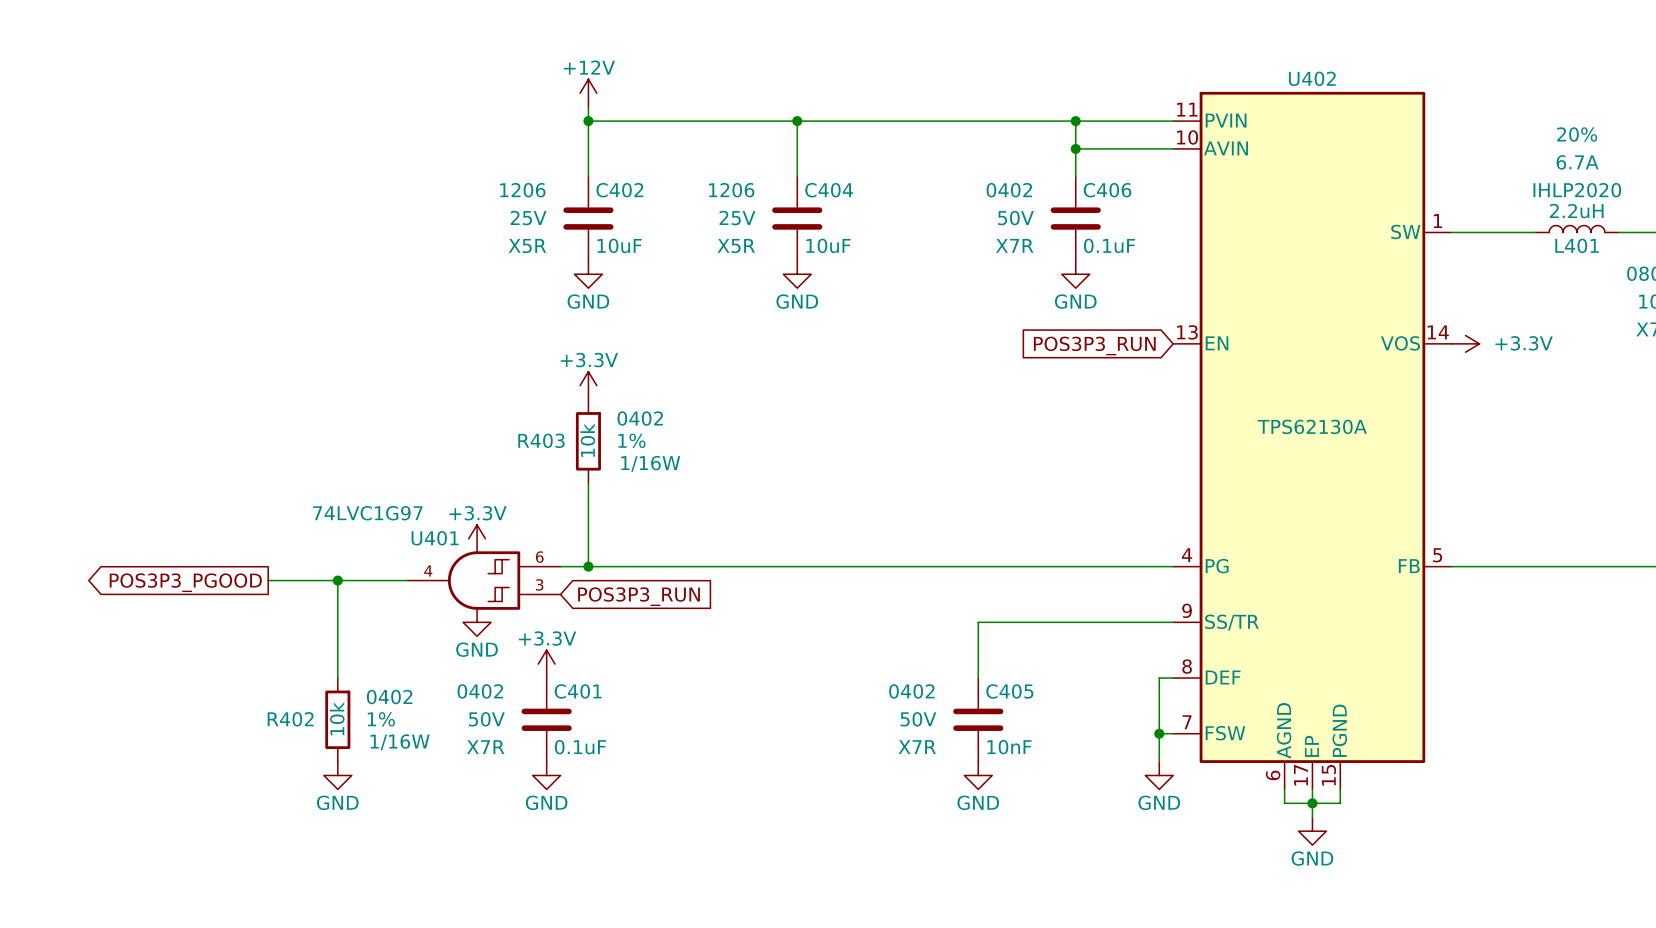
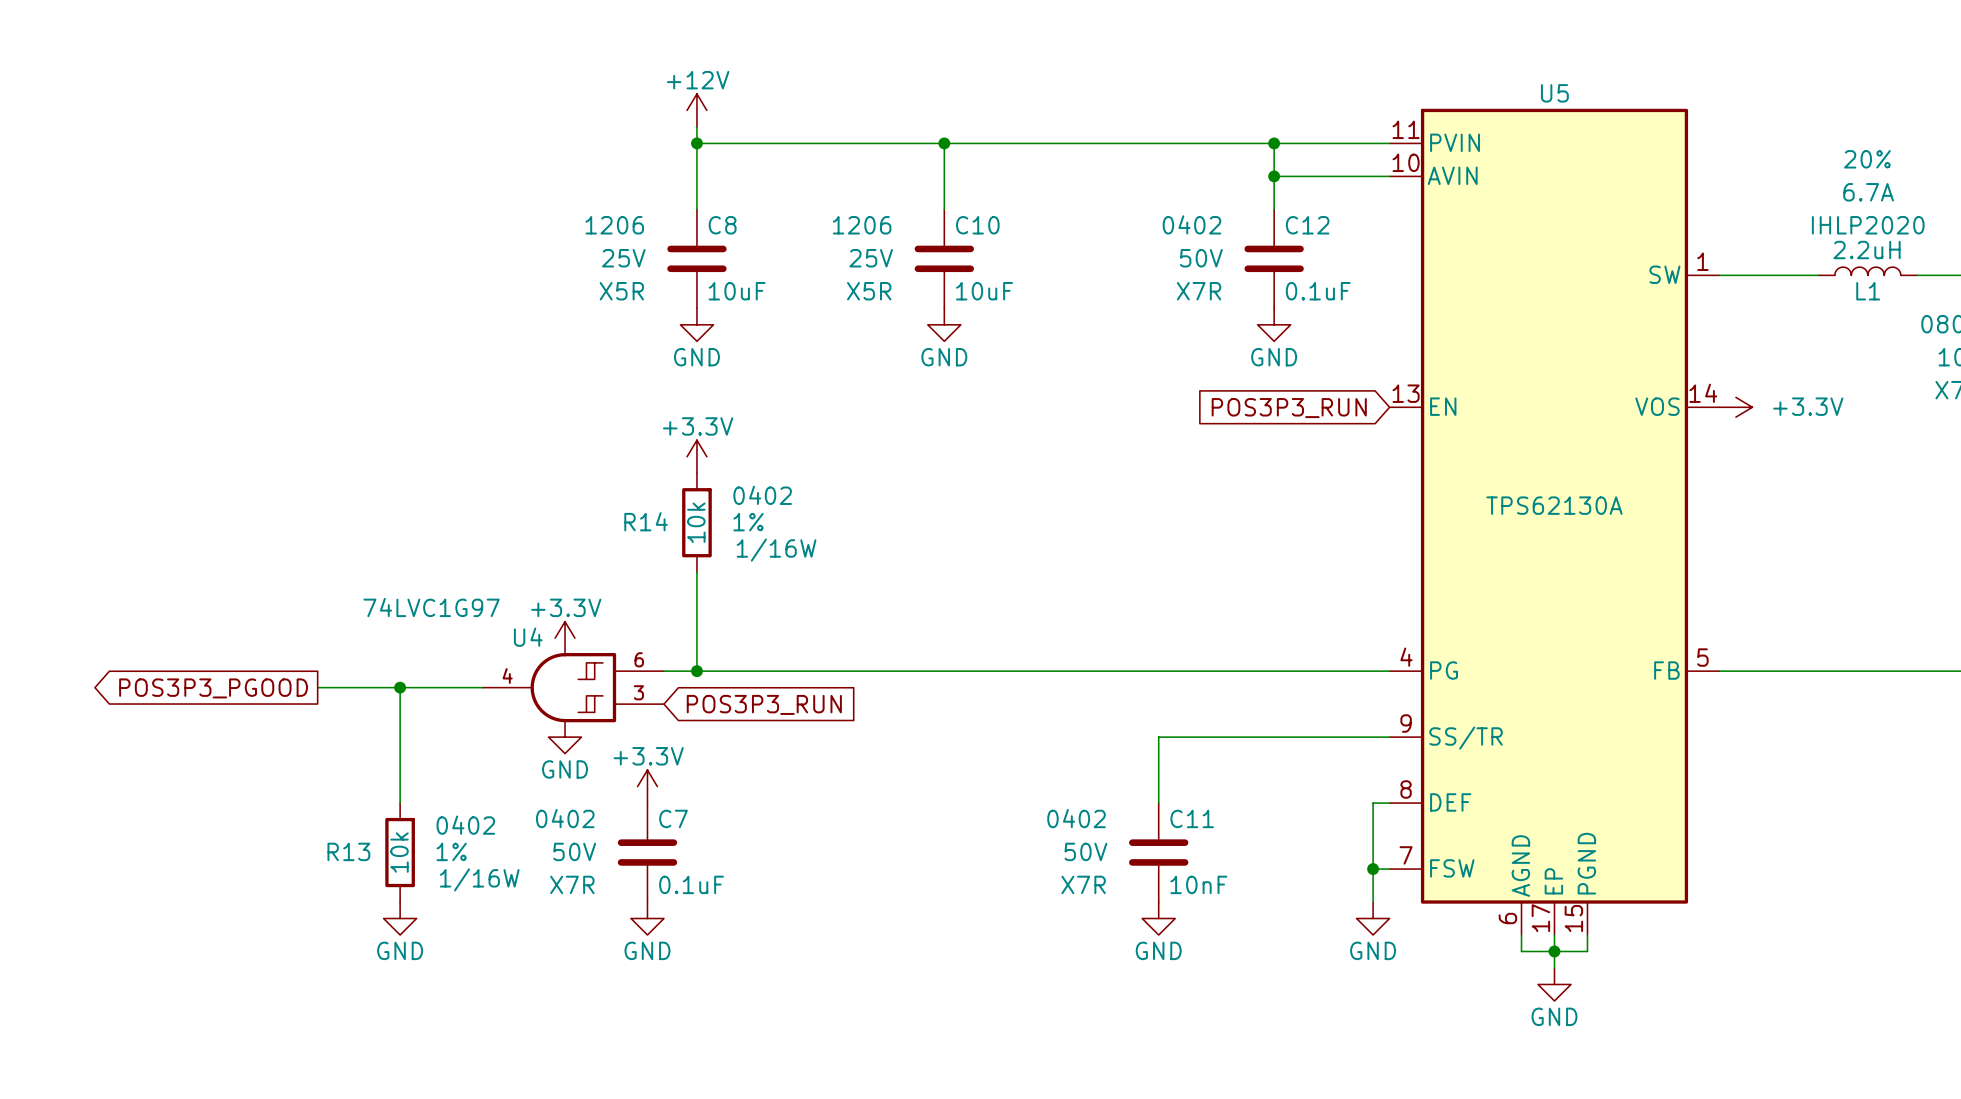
U402 name: U402 (1312, 78) -> U5 (1554, 93)
C402 name: C402 (619, 190) -> C8 (722, 225)
C404 name: C404 (829, 190) -> C10 (977, 225)
C406 name: C406 (1107, 190) -> C12 (1307, 225)
L401 name: L401 (1577, 245) -> L1 (1868, 291)
R403 name: R403 (541, 440) -> R14 (646, 521)
U401 name: U401 (435, 538) -> U4 (528, 637)
C401 name: C401 (578, 691) -> C7 (673, 818)
C405 name: C405 (1009, 691) -> C11 (1192, 818)
R402 name: R402 (290, 719) -> R13 (348, 851)

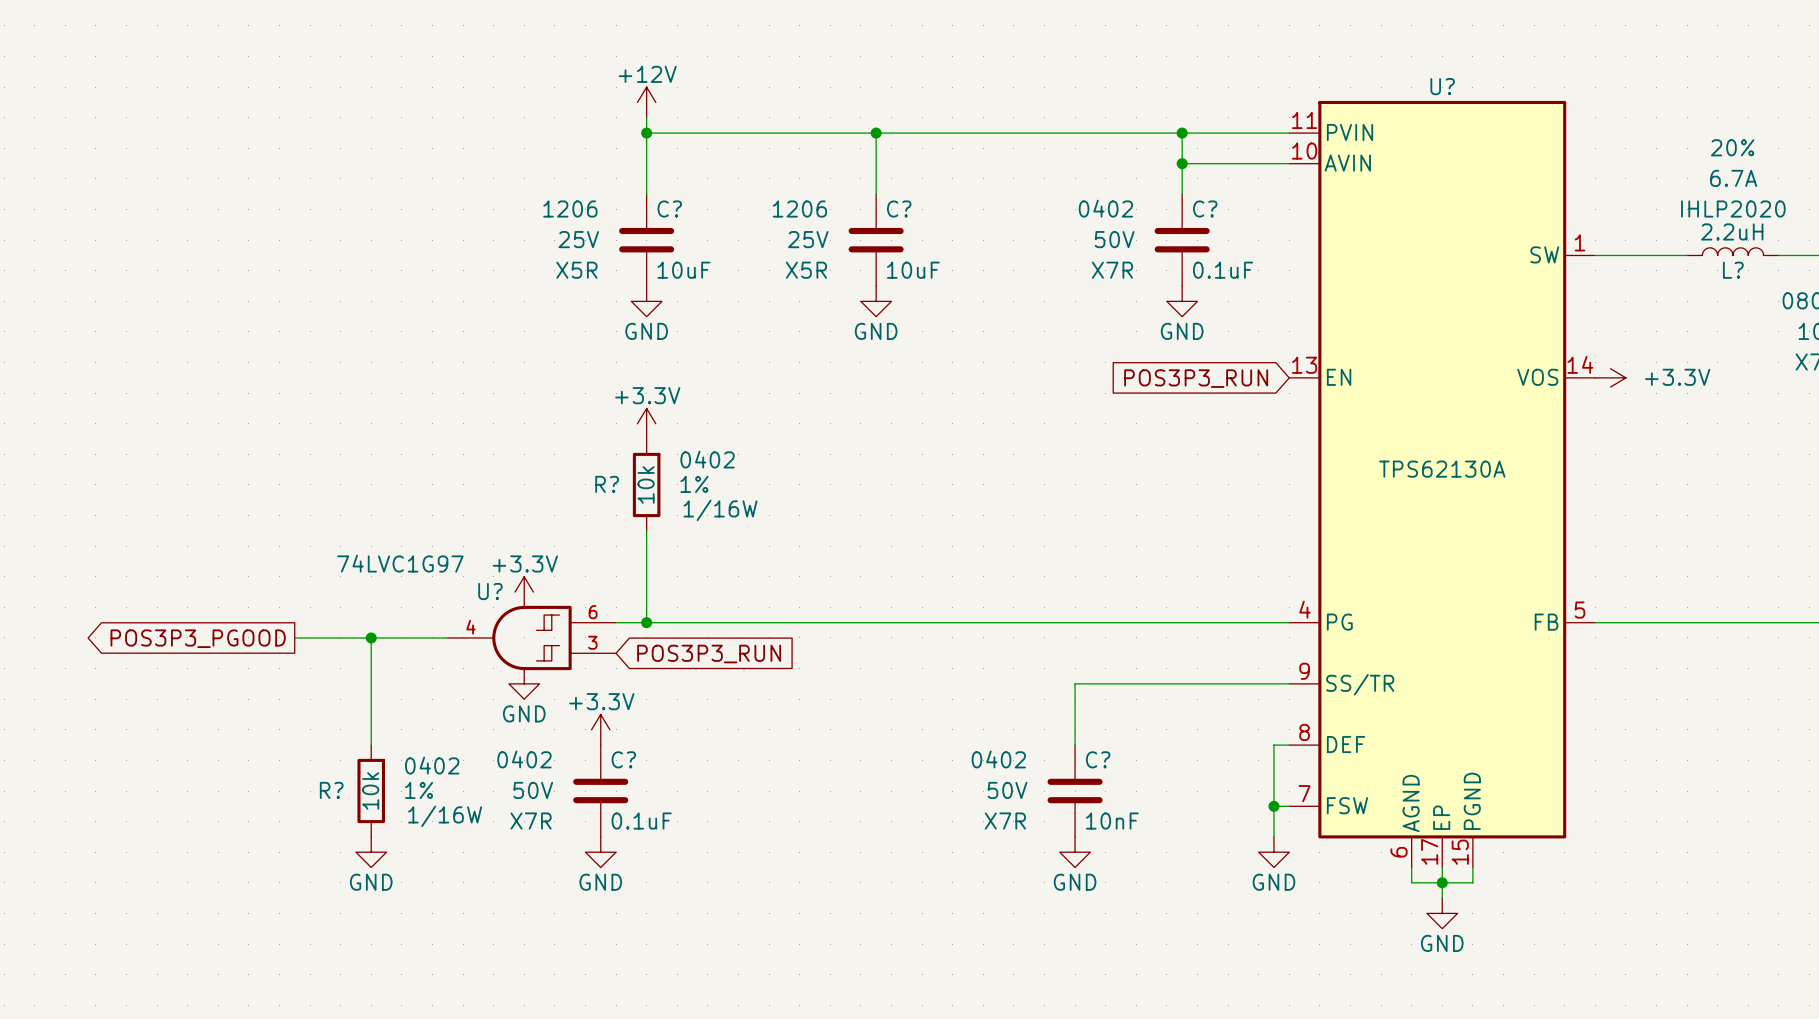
U5 name: U5 (1554, 93) -> U? (1442, 86)
C8 name: C8 (722, 225) -> C? (669, 209)
C10 name: C10 (977, 225) -> C? (899, 209)
C12 name: C12 (1307, 225) -> C? (1205, 209)
L1 name: L1 (1868, 291) -> L? (1733, 270)
R14 name: R14 (646, 521) -> R? (607, 484)
U4 name: U4 (528, 637) -> U? (490, 591)
C7 name: C7 (673, 818) -> C? (623, 759)
C11 name: C11 (1192, 818) -> C? (1098, 759)
R13 name: R13 (348, 851) -> R? (331, 790)

